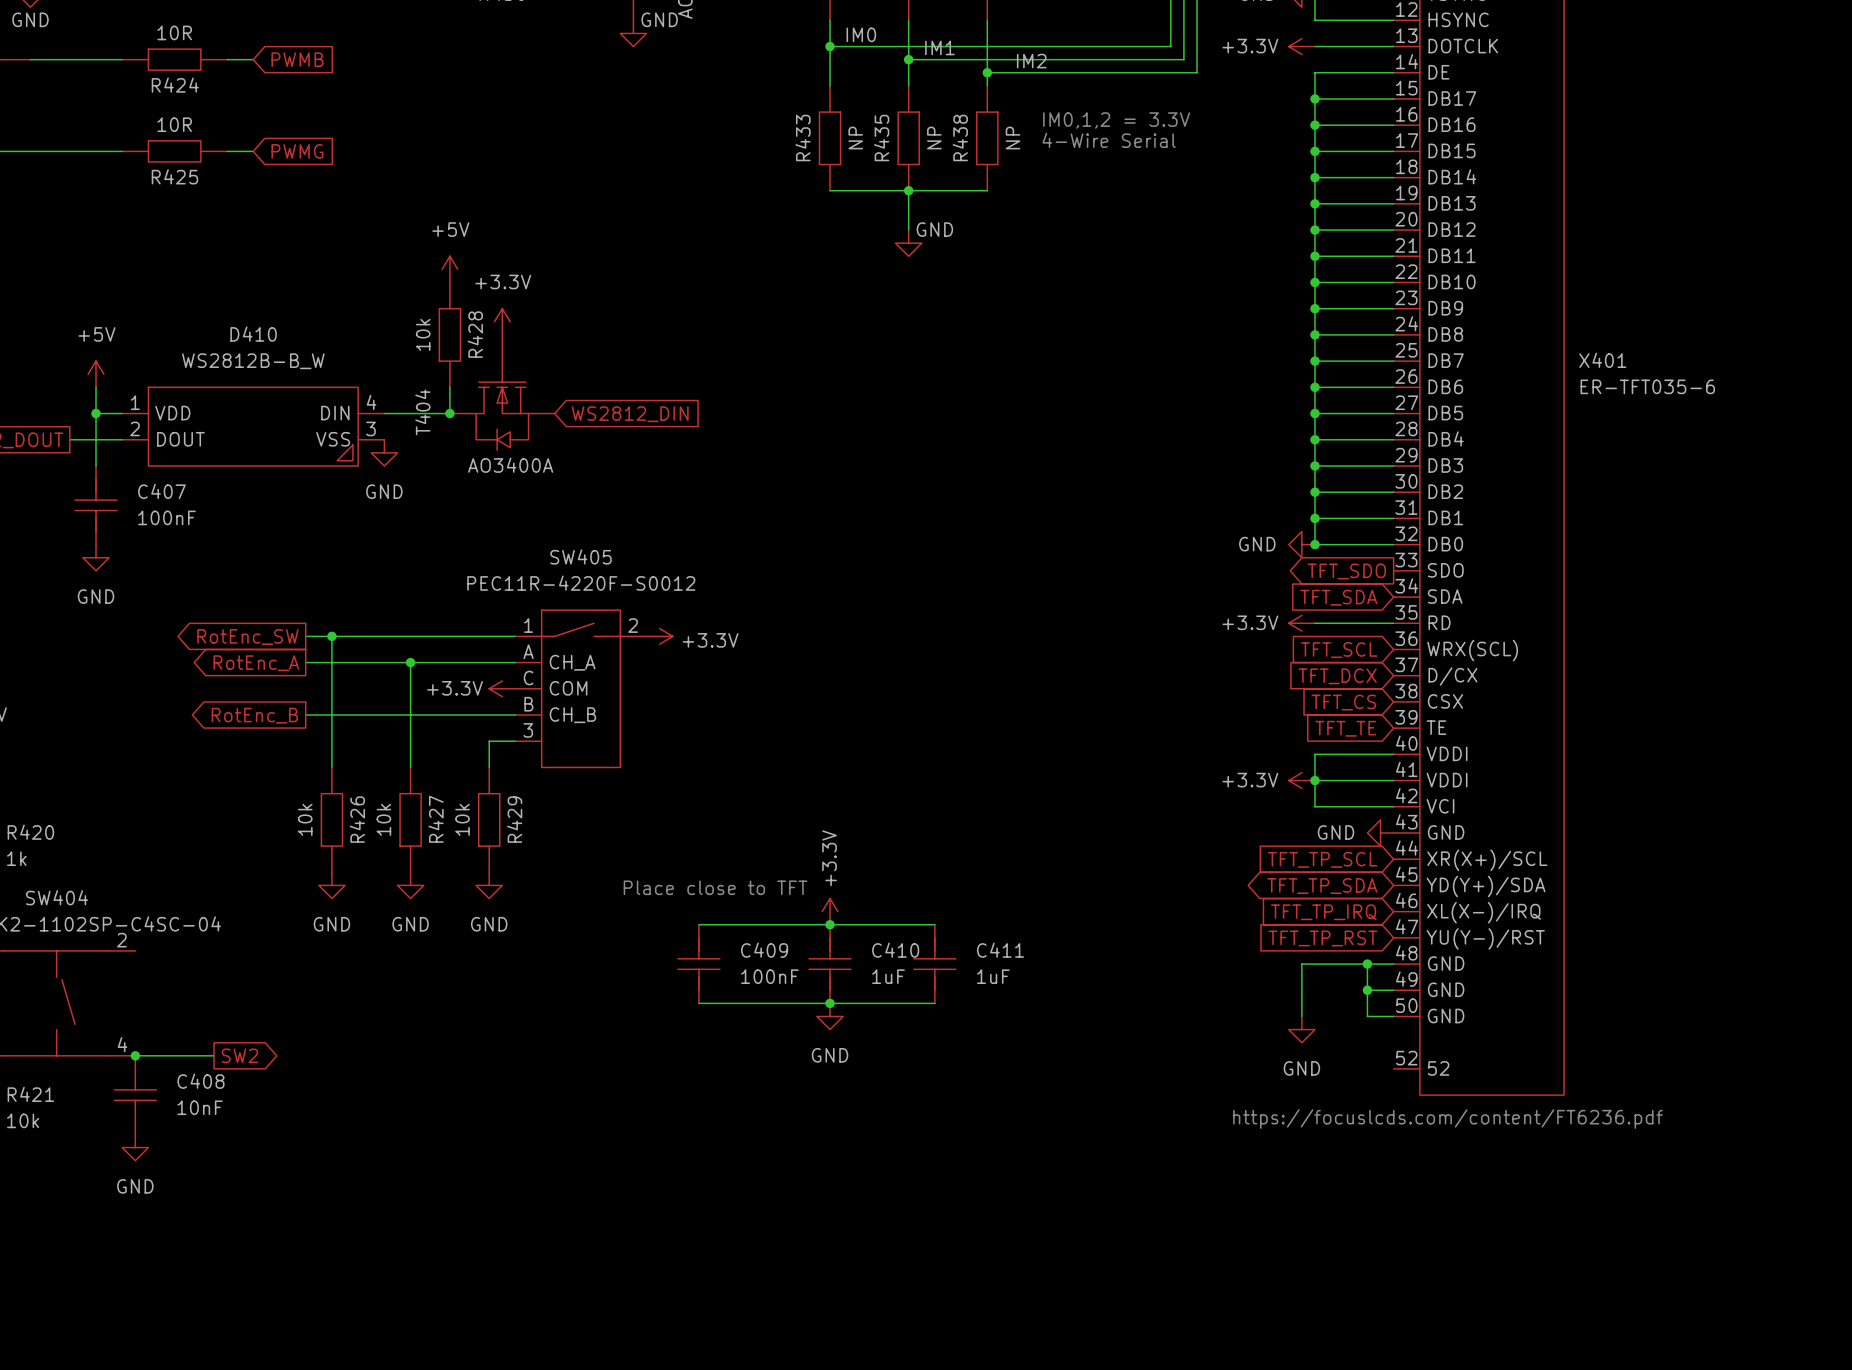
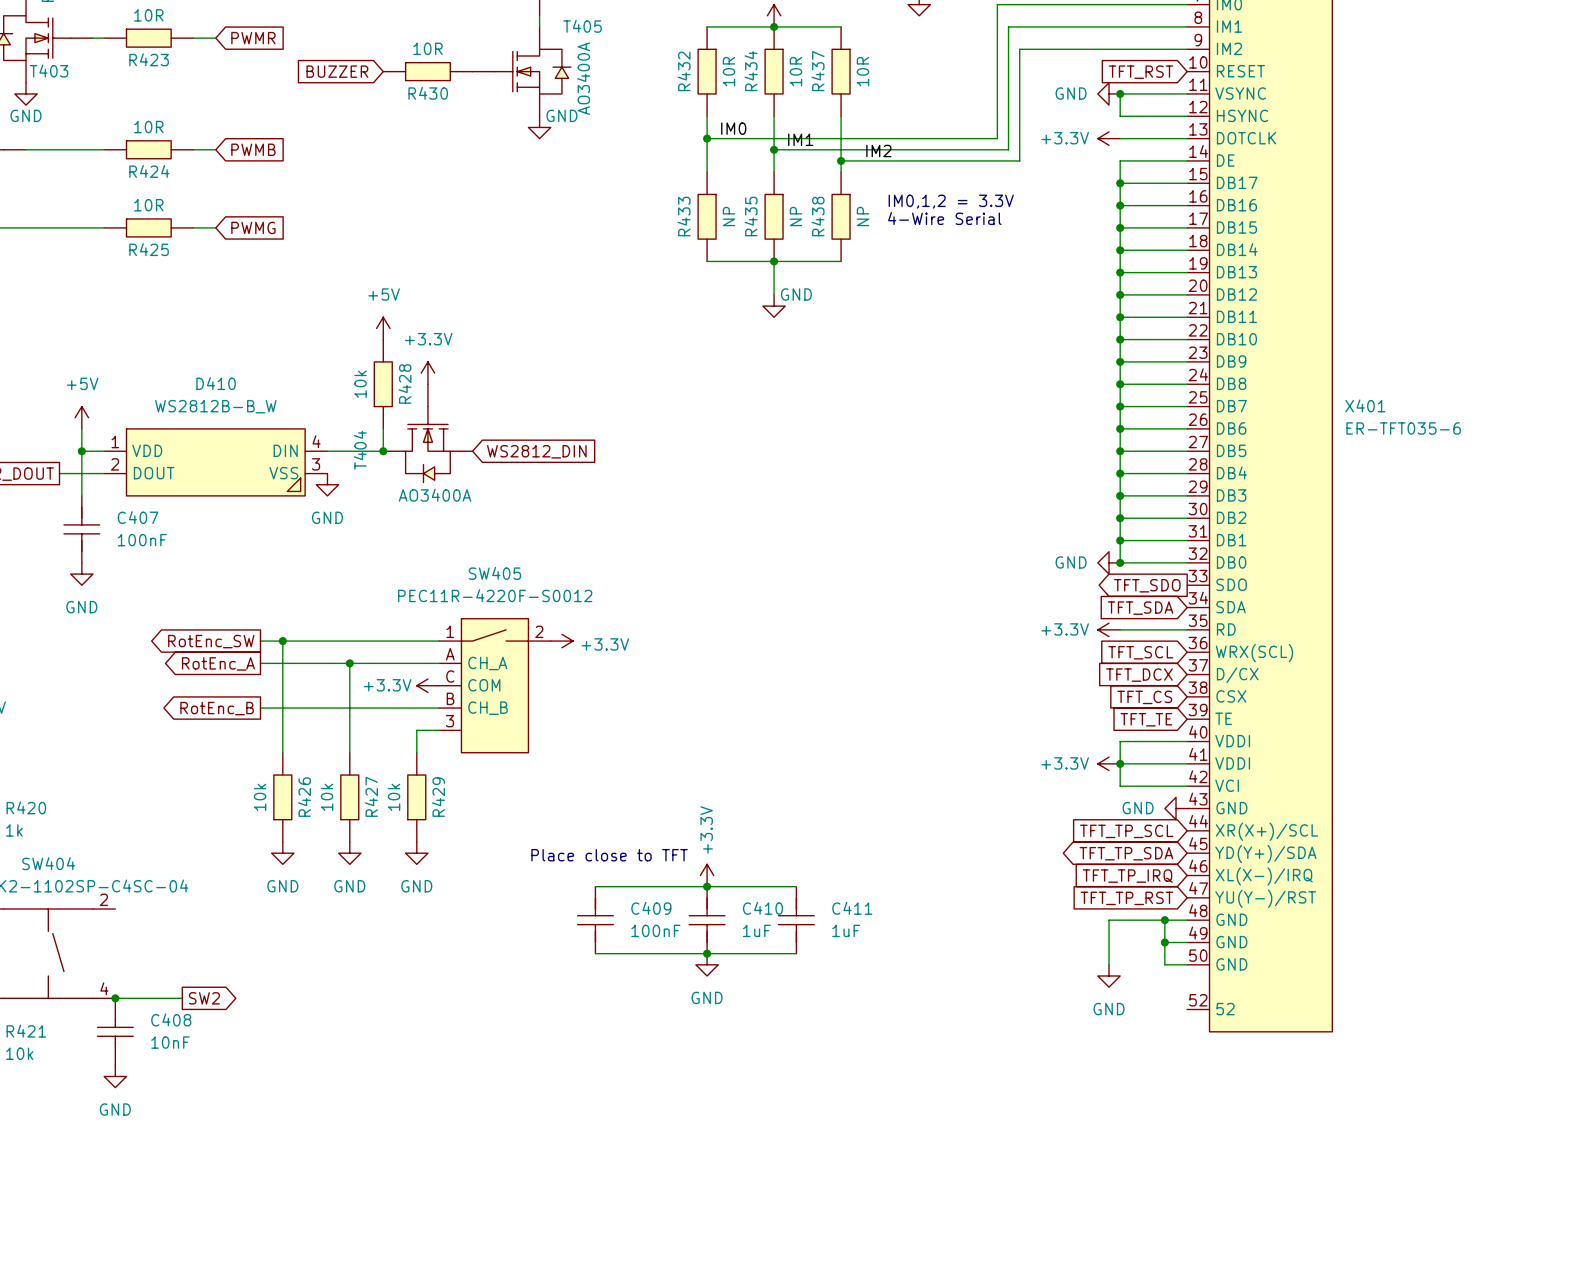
text: https://focuslcds.com/content/FT6236.pdf (1448, 1119) -> none

